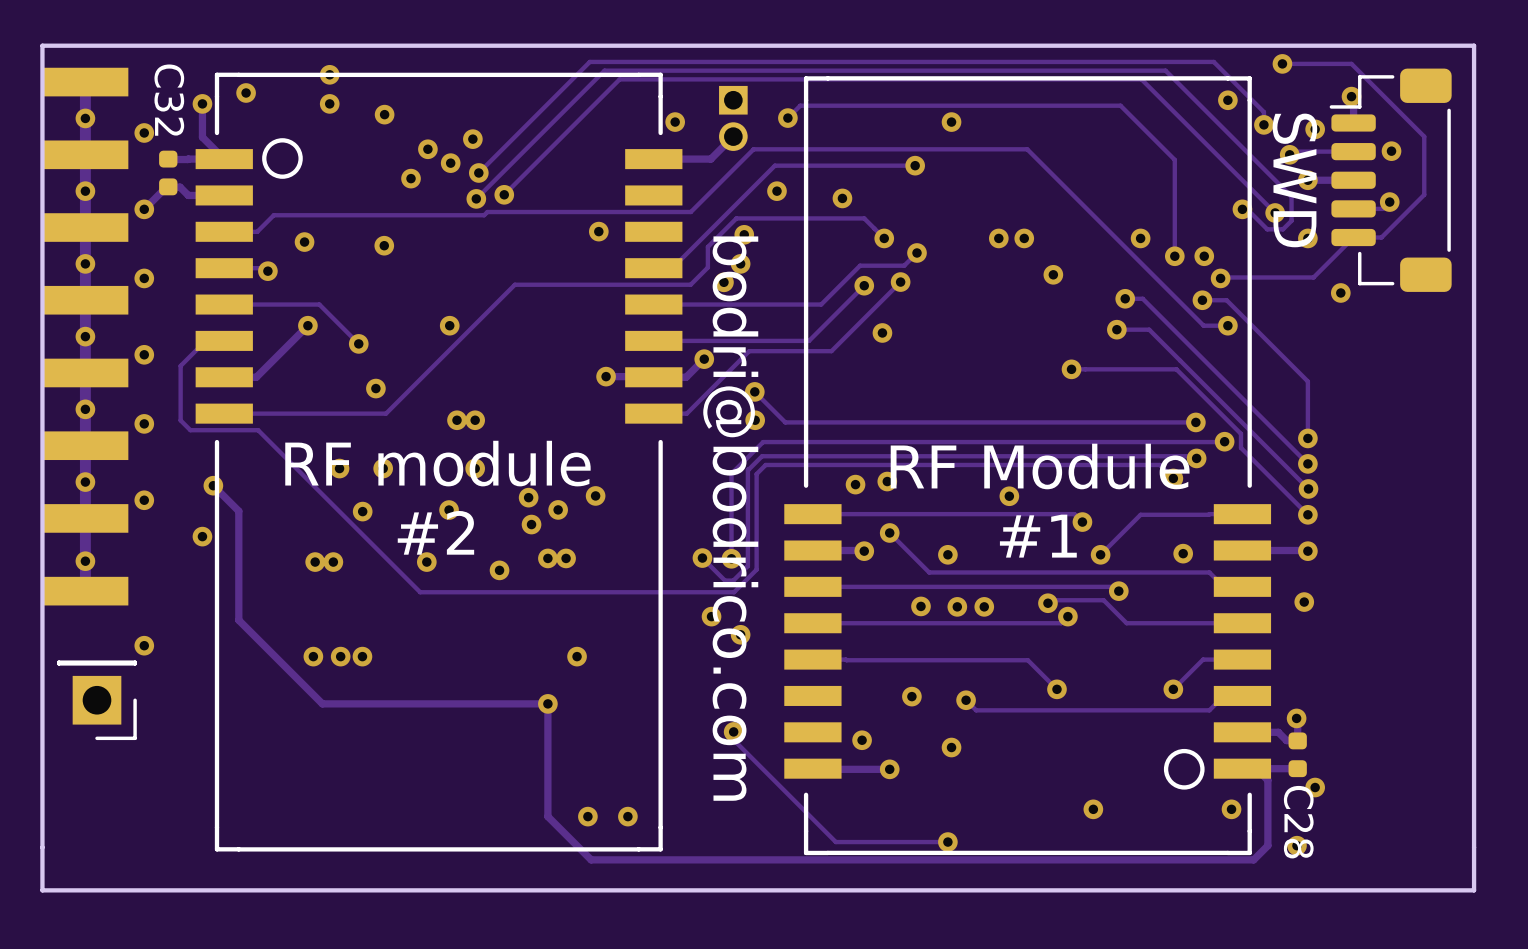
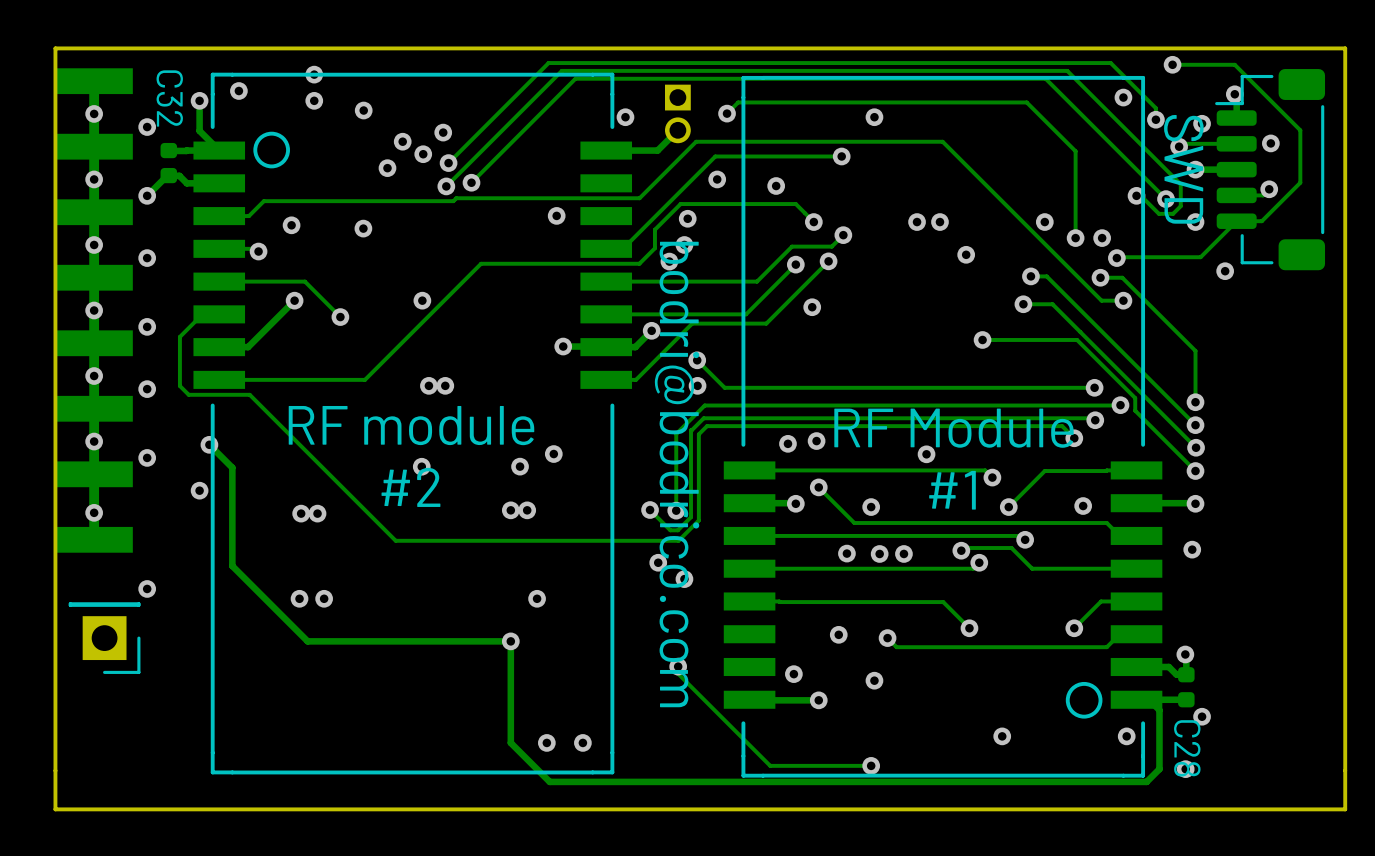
via: (375, 388) -> none
via: (339, 468) -> none
via: (383, 468) -> none
via: (475, 468) -> none
via: (528, 497) -> none
via: (362, 511) -> none
via: (531, 524) -> none
via: (426, 562) -> none
via: (499, 570) -> none
via: (362, 656) -> none

